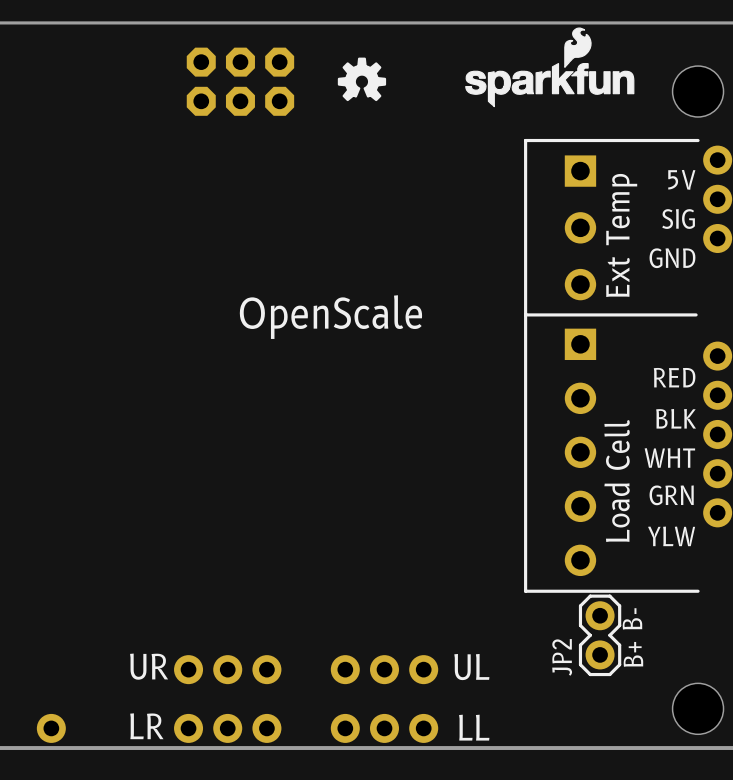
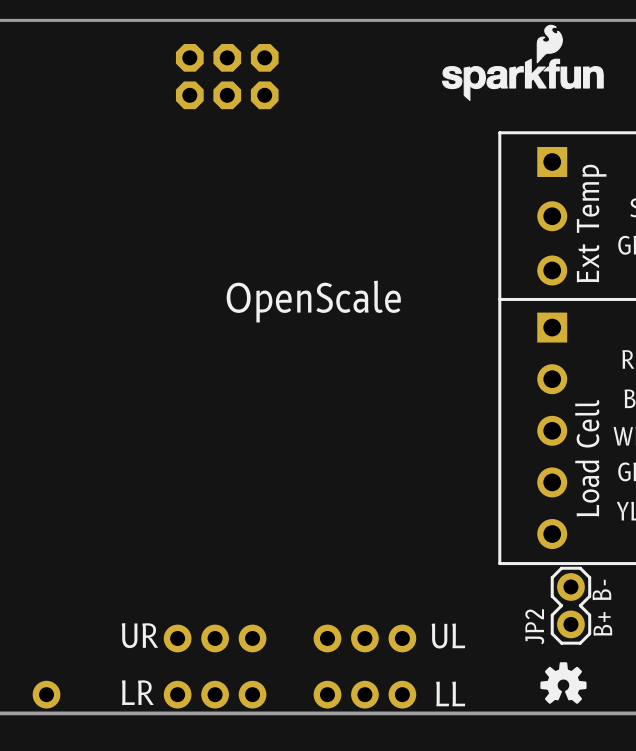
drawing: [337, 57, 387, 102] -> none
drawing: none -> [540, 662, 587, 704]

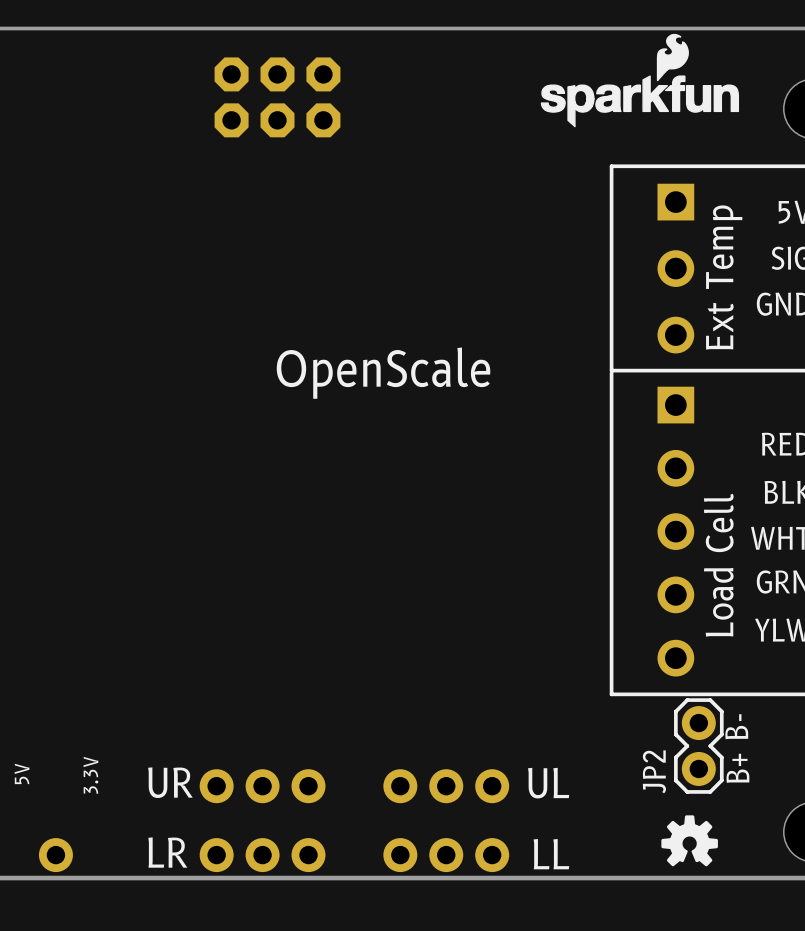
text: none -> 5V (22, 773)
text: none -> 3.3V (90, 775)

